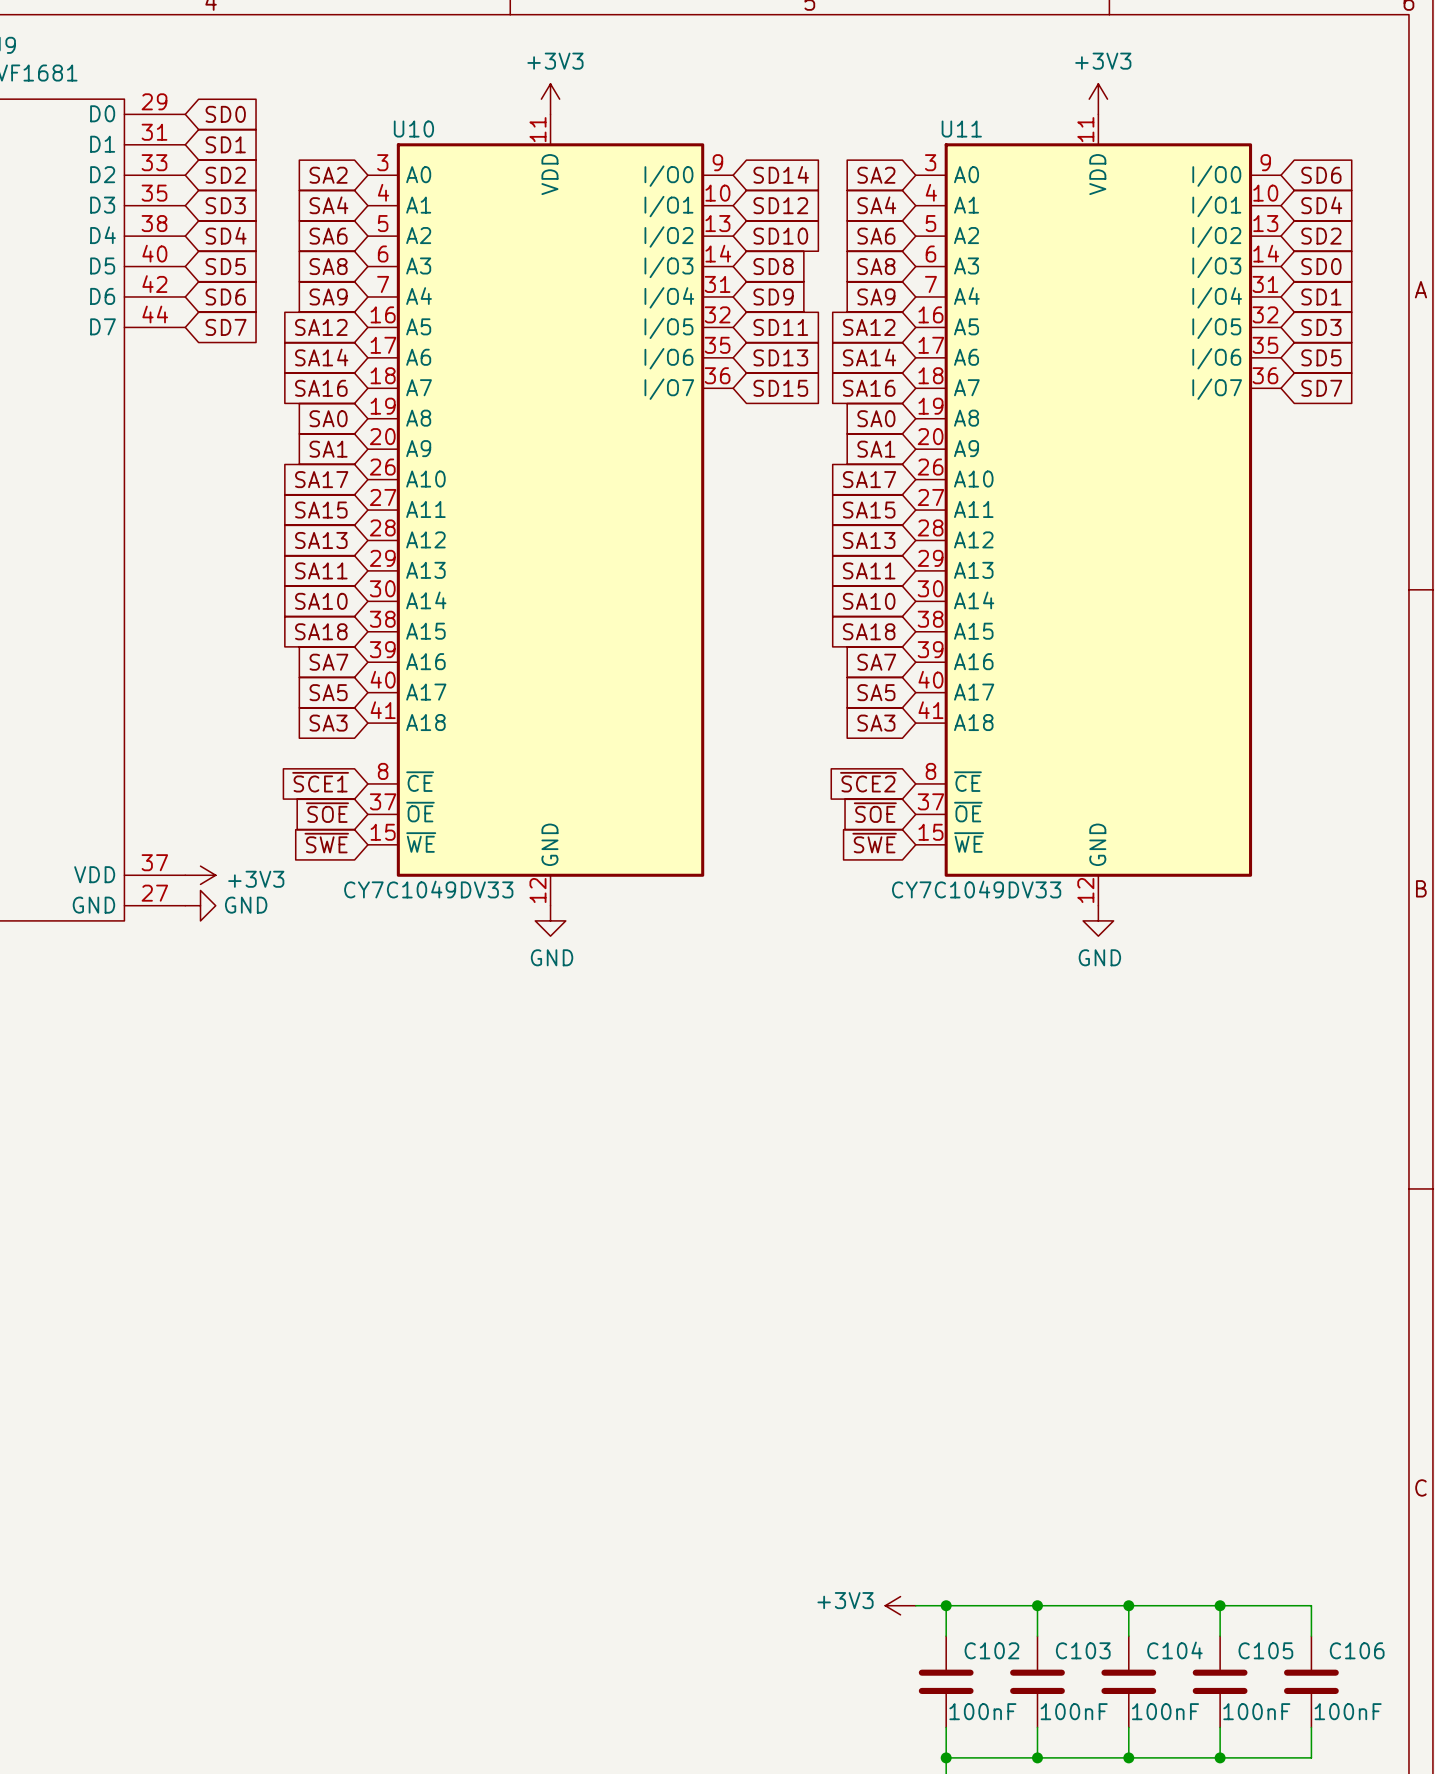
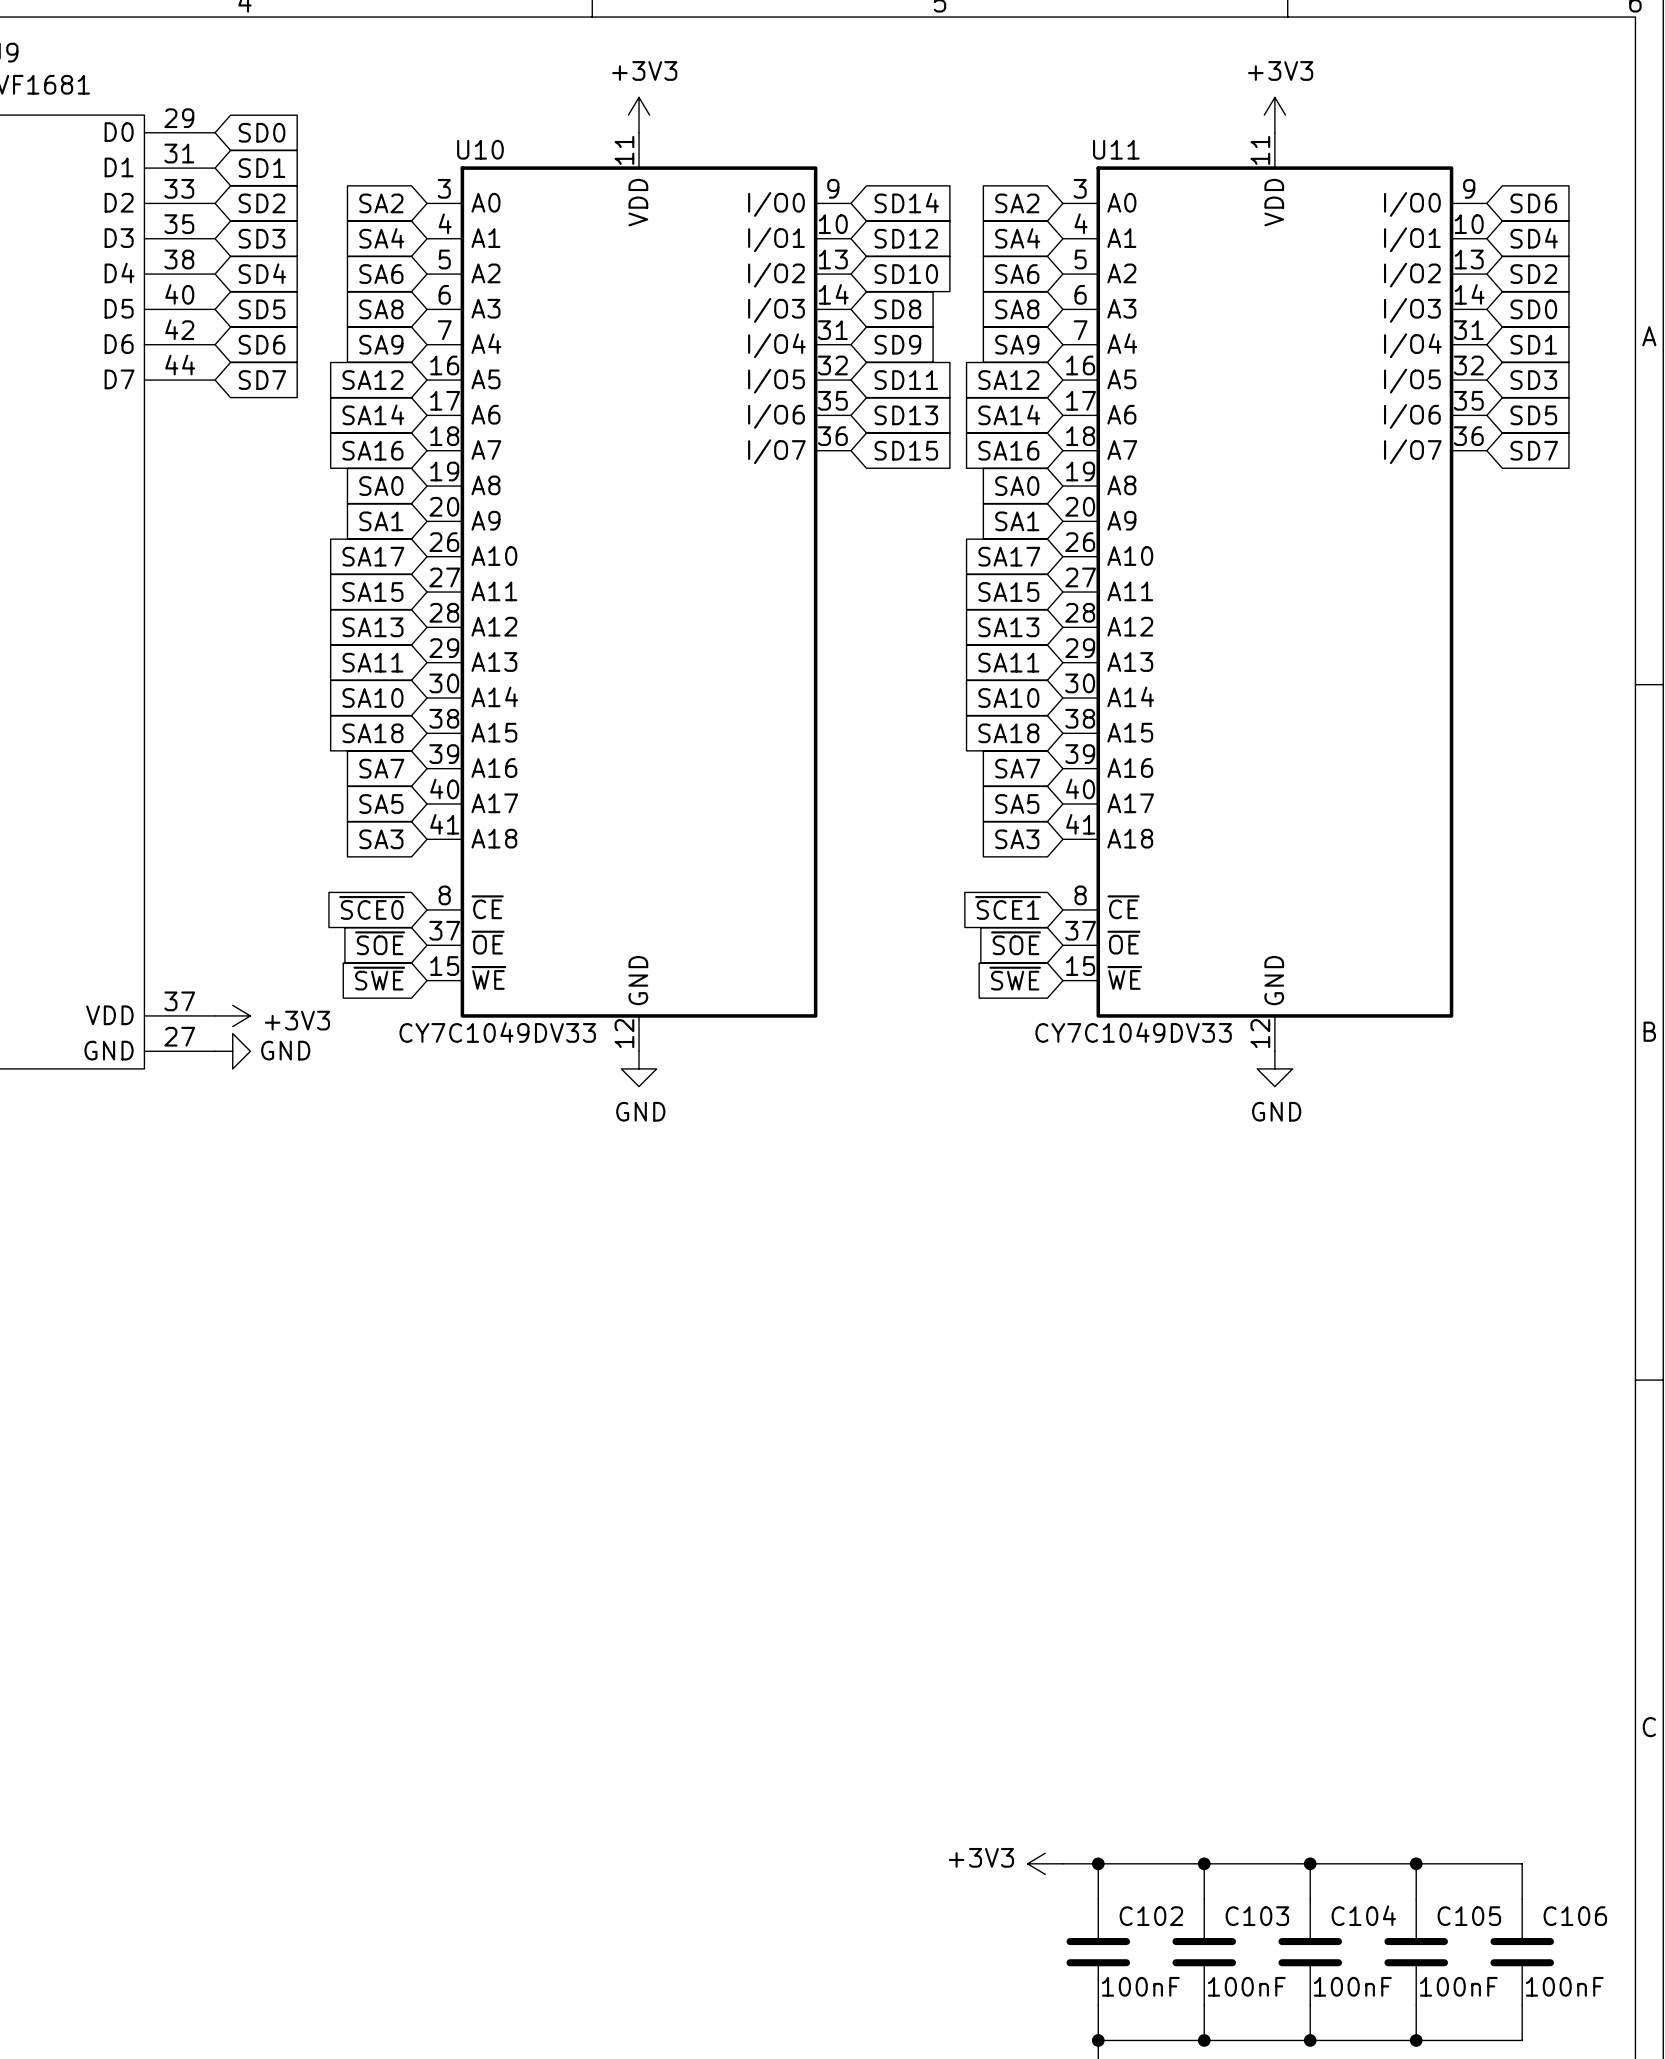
global label: ~{SCE1} (320, 782) -> ~{SCE0} (372, 907)
global label: ~{SCE2} (868, 782) -> ~{SCE1} (1008, 907)

